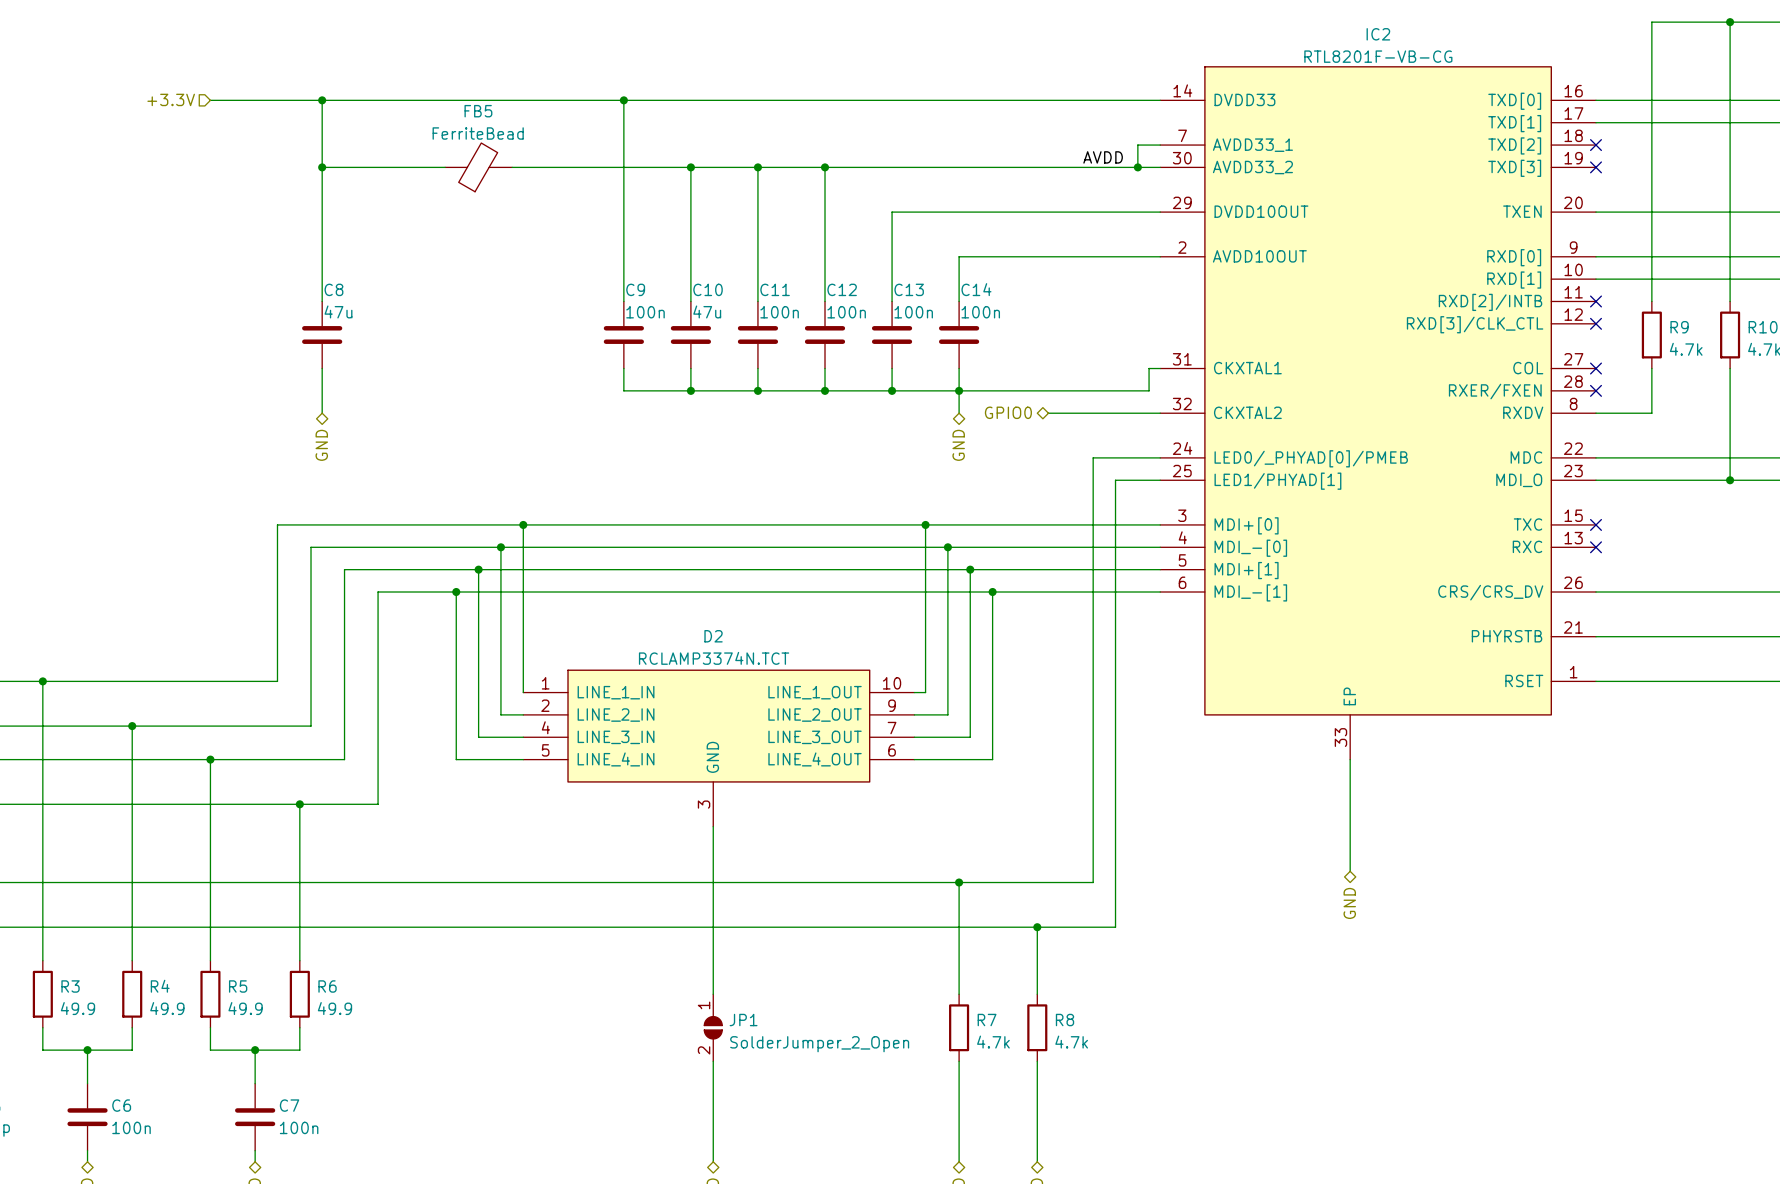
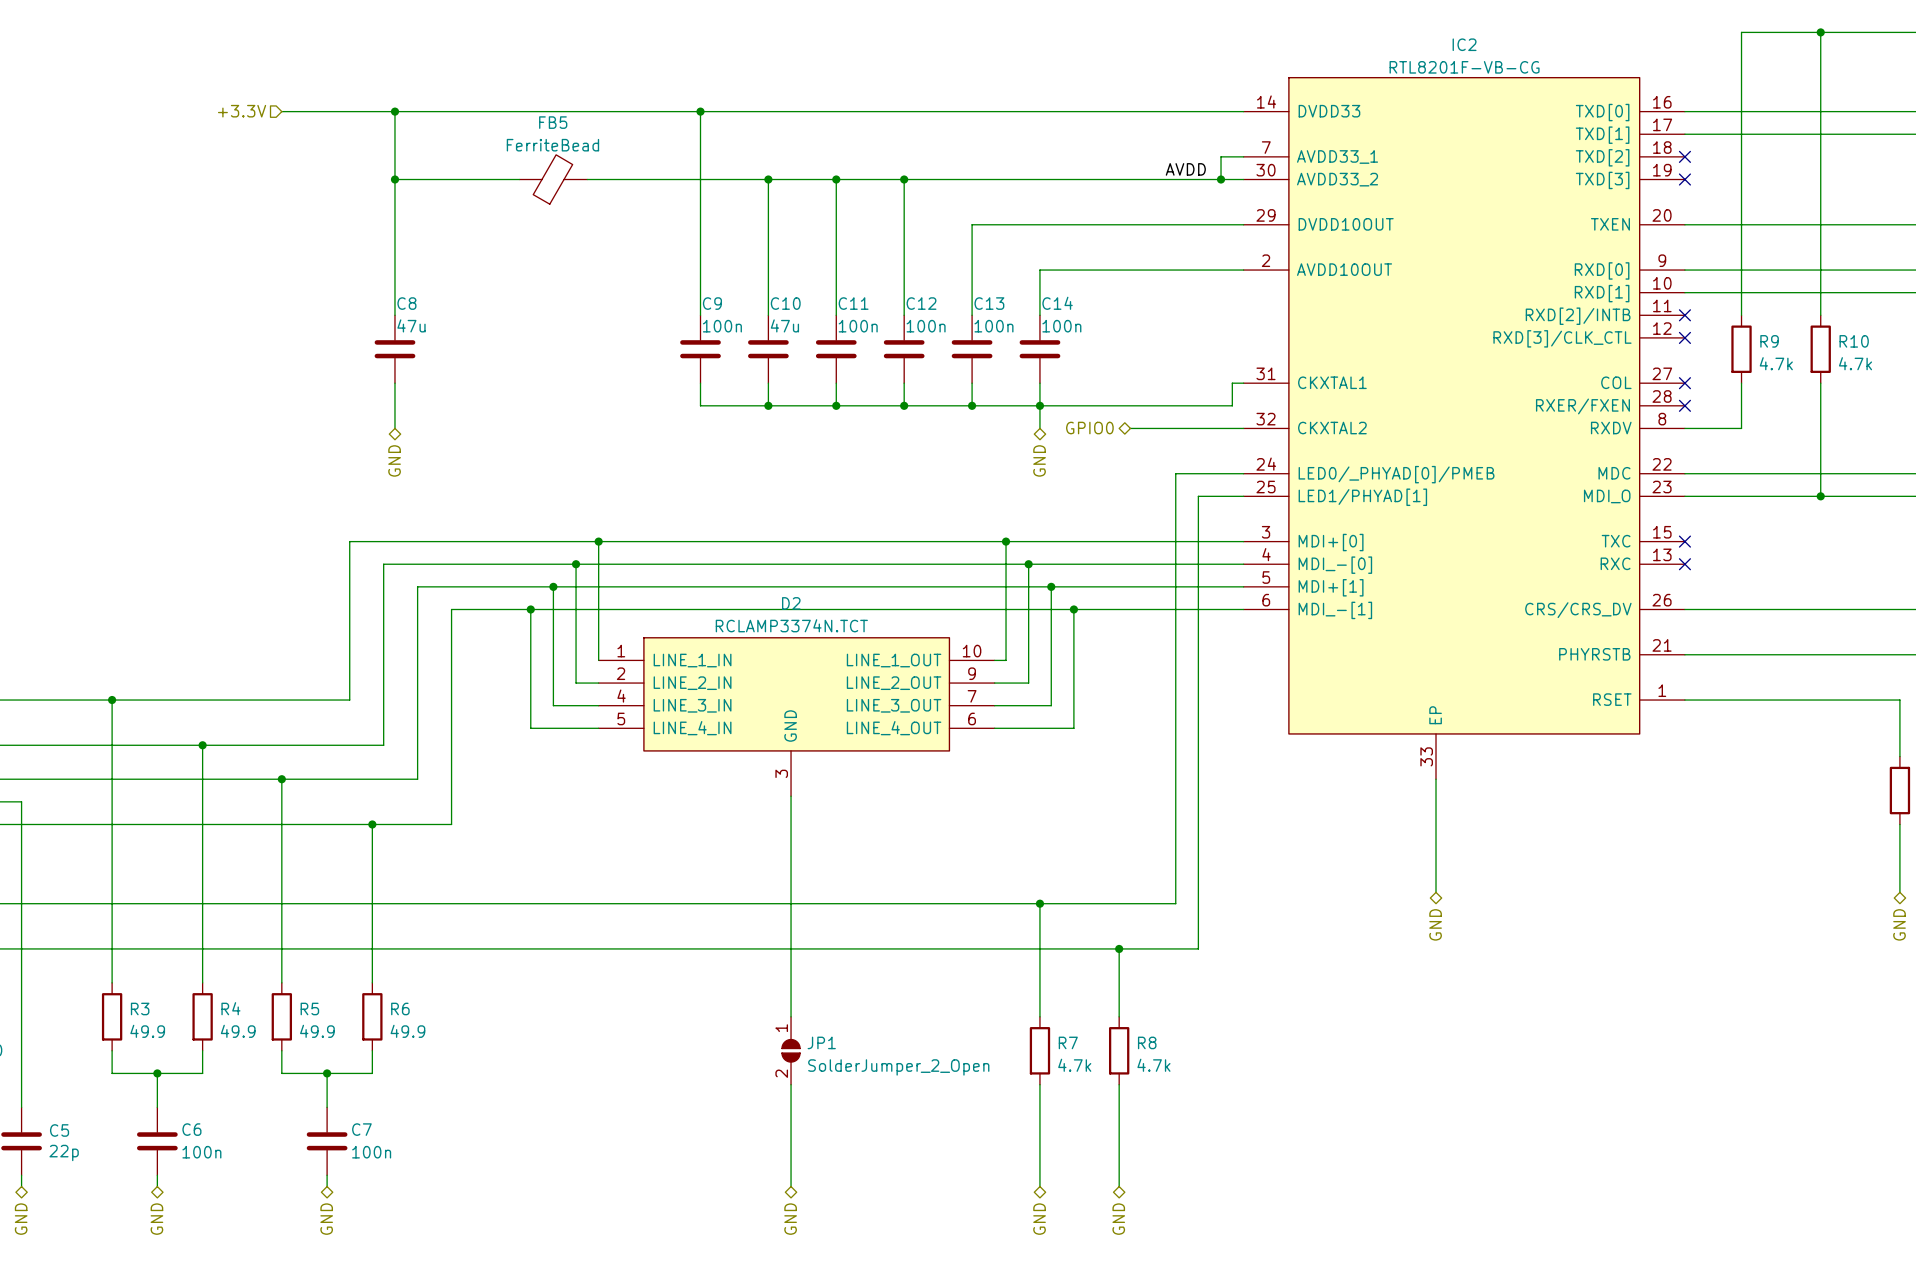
wire: (523, 642) (523, 692) -> none
wire: (925, 642) (925, 692) (914, 692) -> (1006, 660) (994, 660)
wire: (500, 664) (500, 714) (523, 714) -> (576, 683) (598, 683)
wire: (947, 664) (947, 714) (914, 714) -> (1028, 683) (994, 683)
wire: (478, 686) (478, 737) (523, 737) -> (553, 705) (598, 705)
wire: (970, 686) (970, 737) (914, 737) -> (1051, 705) (994, 705)
wire: (456, 709) (456, 759) (523, 759) -> (530, 728) (598, 728)
wire: (992, 709) (992, 759) (914, 759) -> (1073, 728) (994, 728)
D2 position: (718, 748) -> (796, 716)

